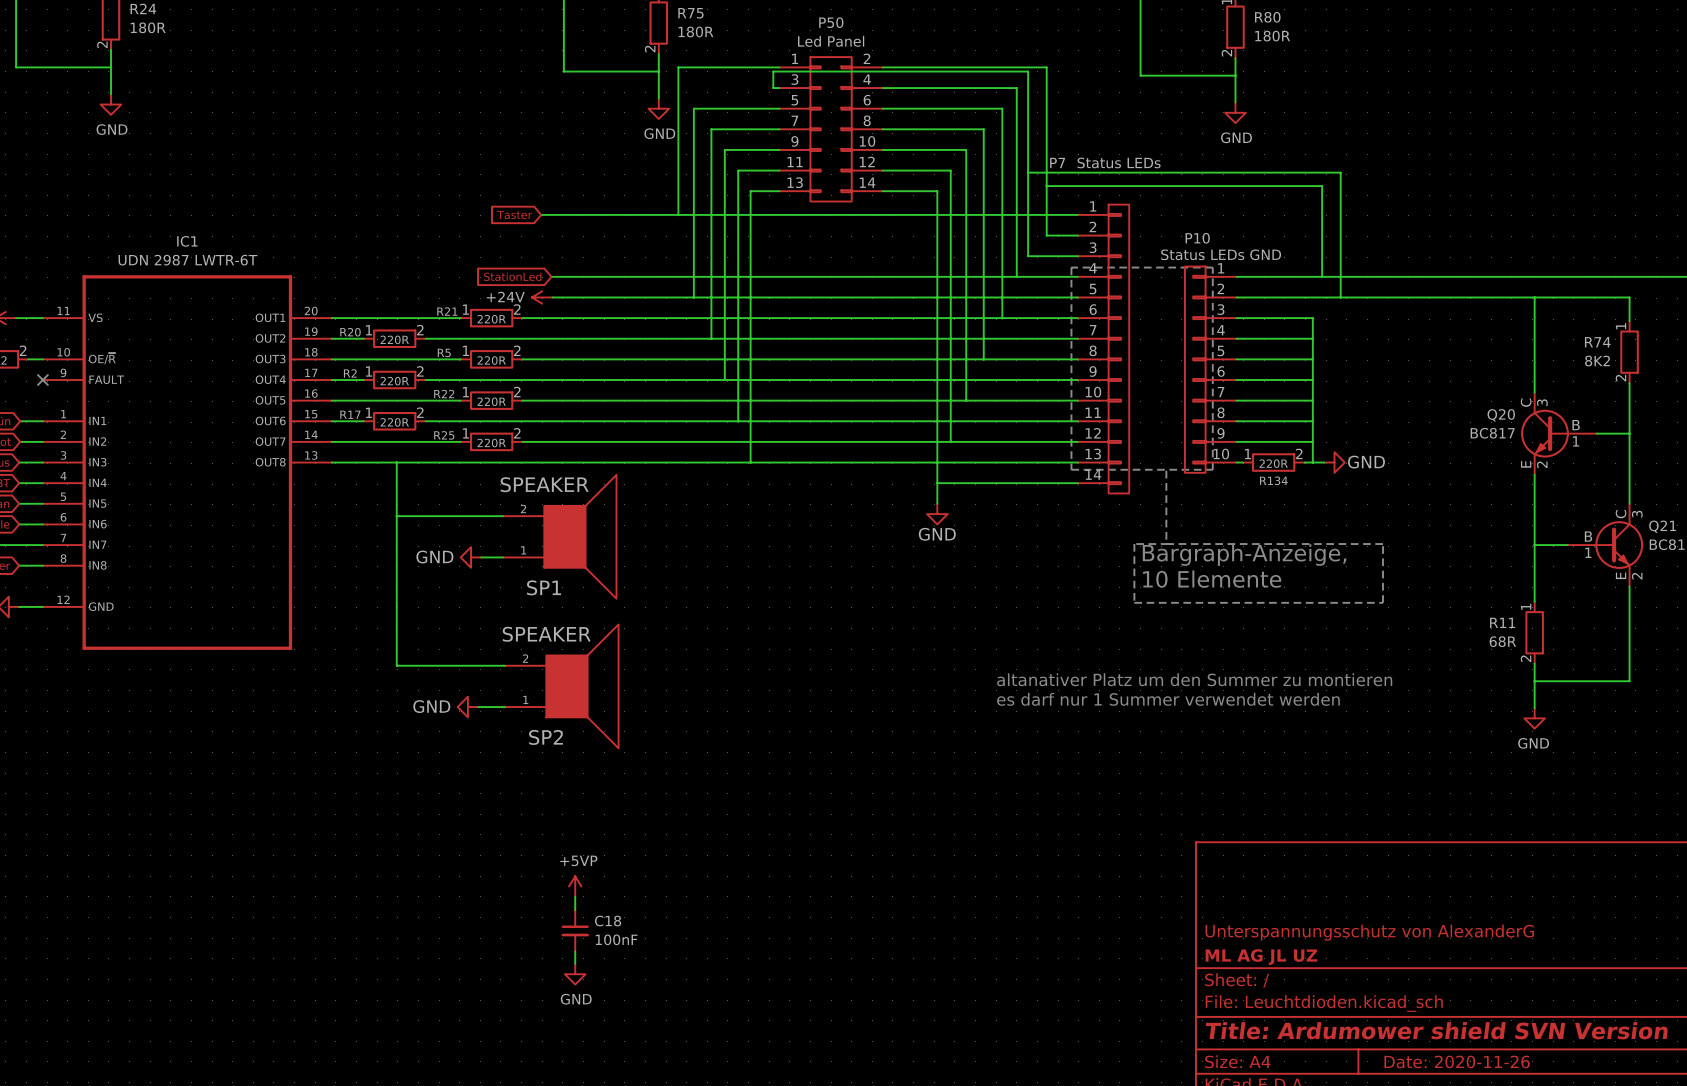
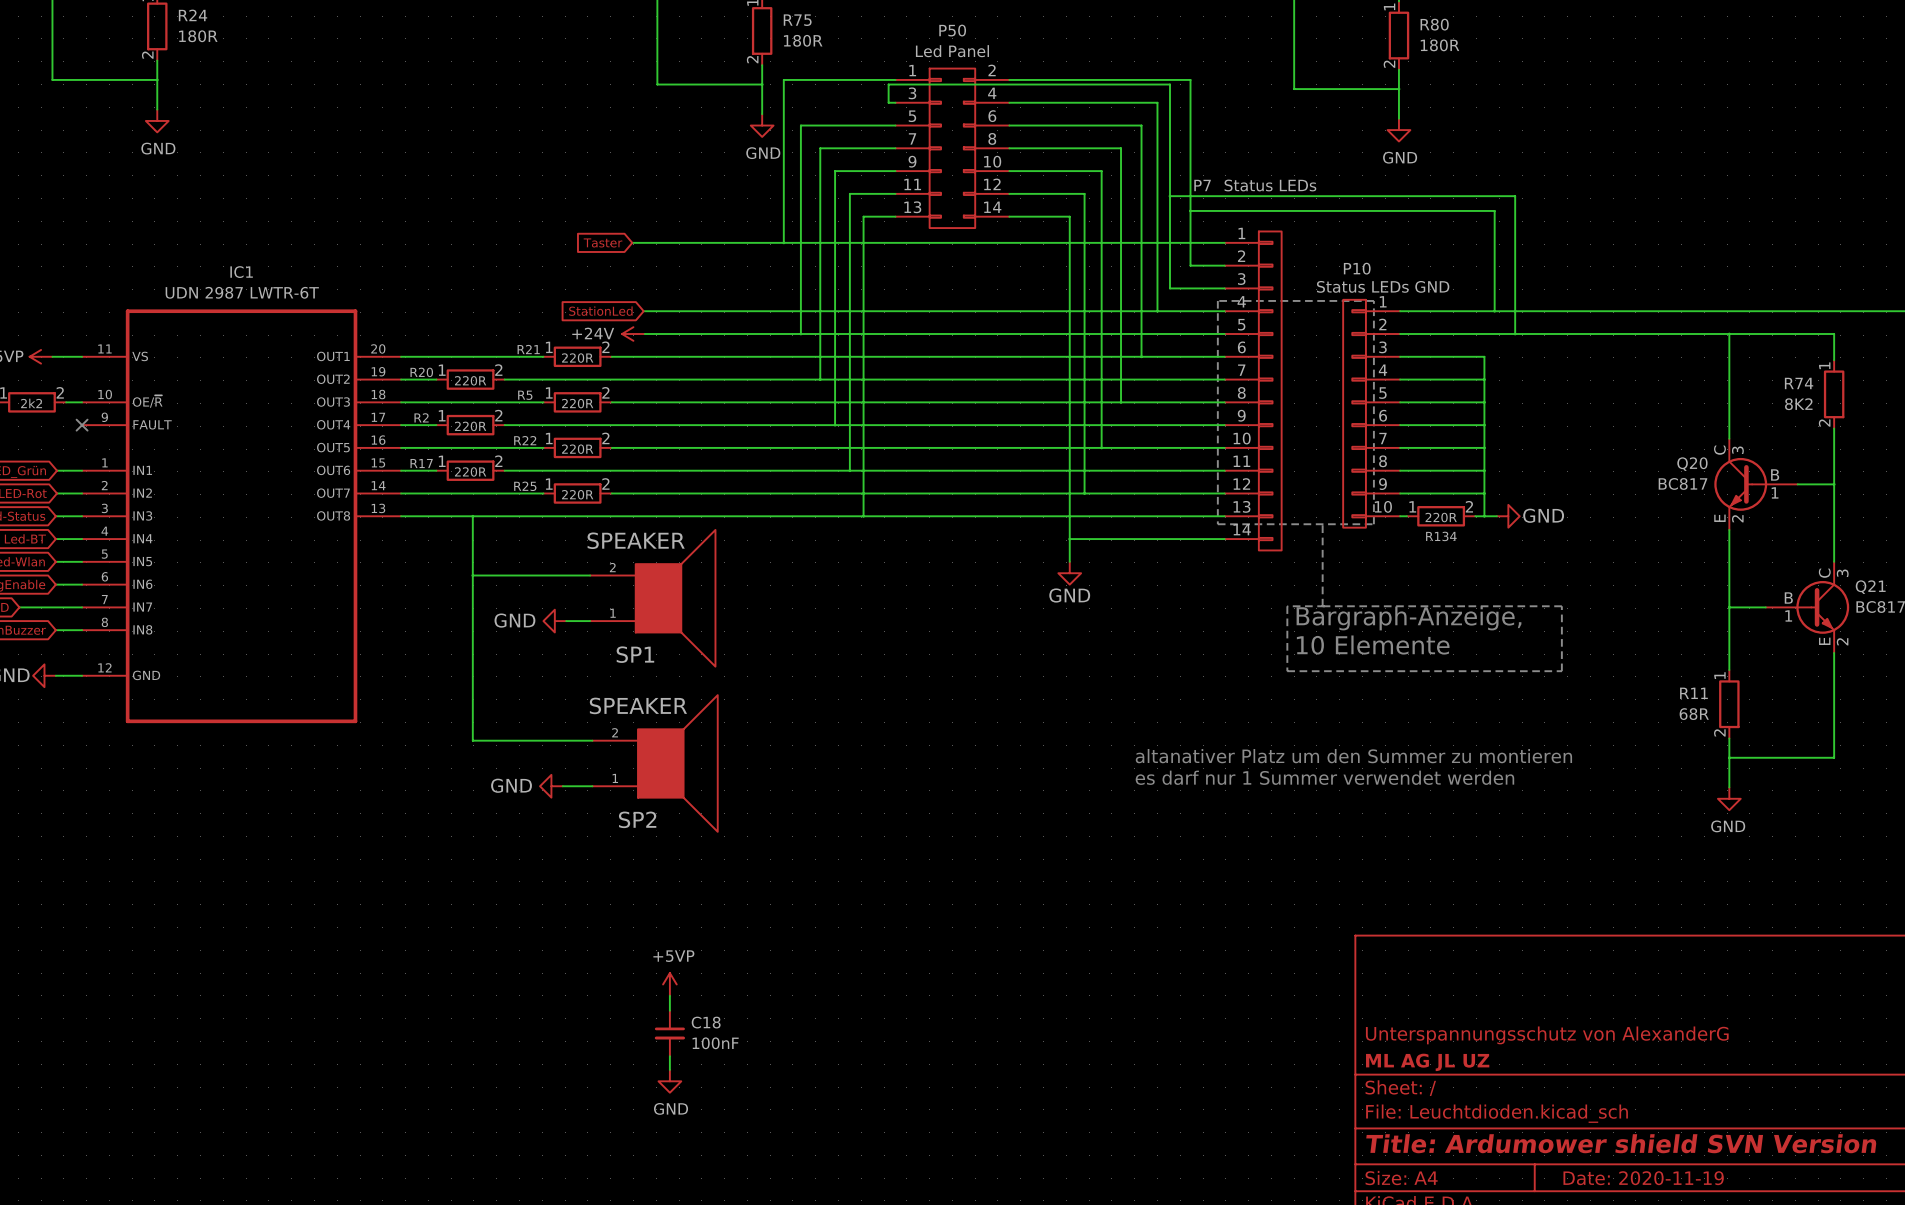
title block: Date: 2020-11-26 (1457, 1061) -> Date: 2020-11-19 (1643, 1178)

